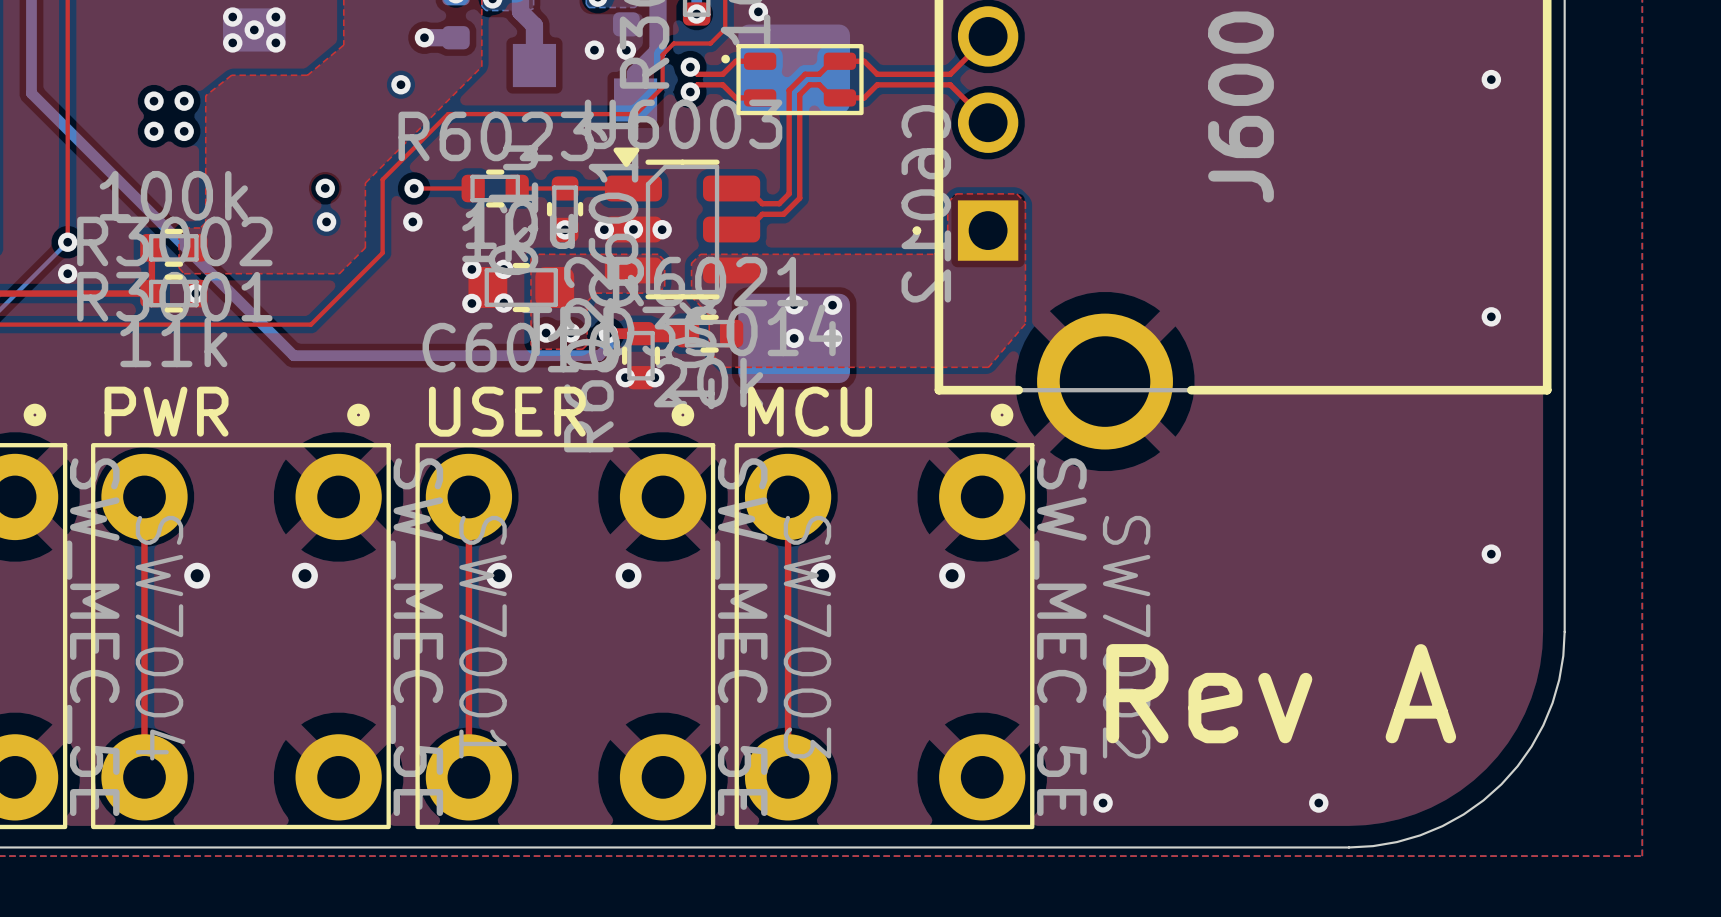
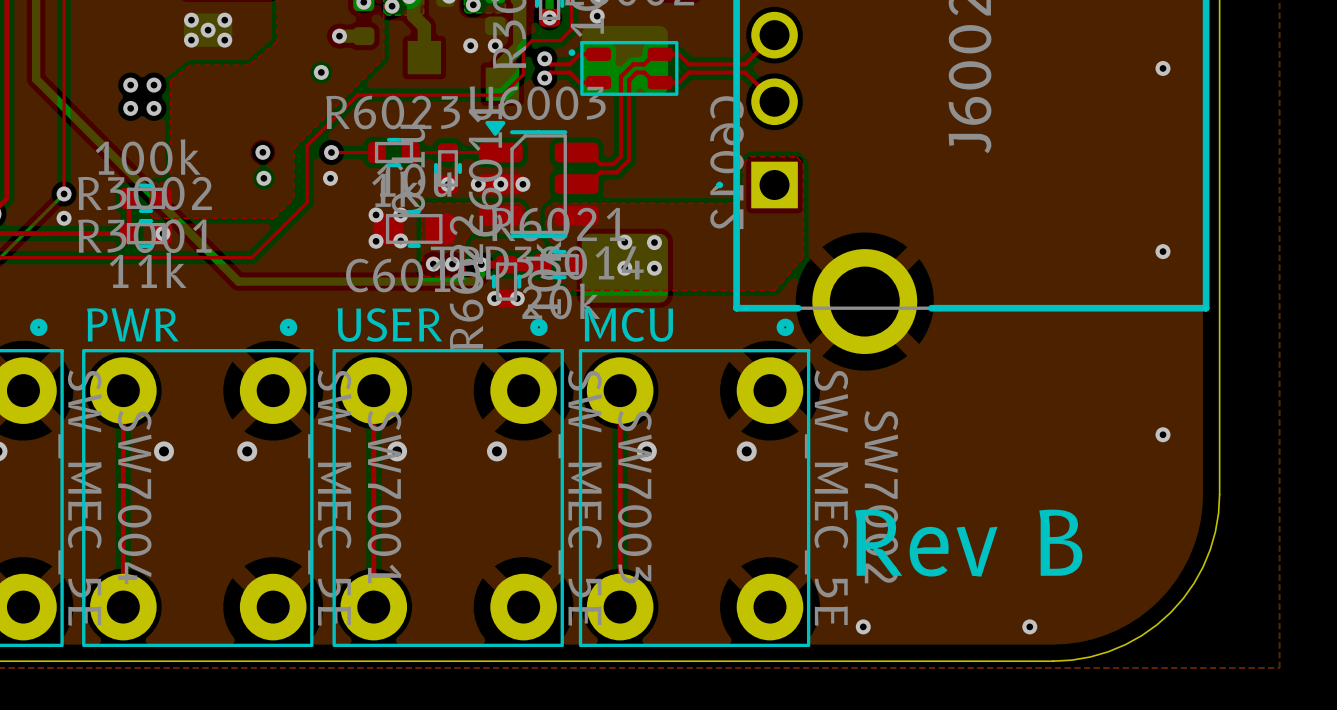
text: Rev A (1281, 693) -> Rev B (968, 543)

